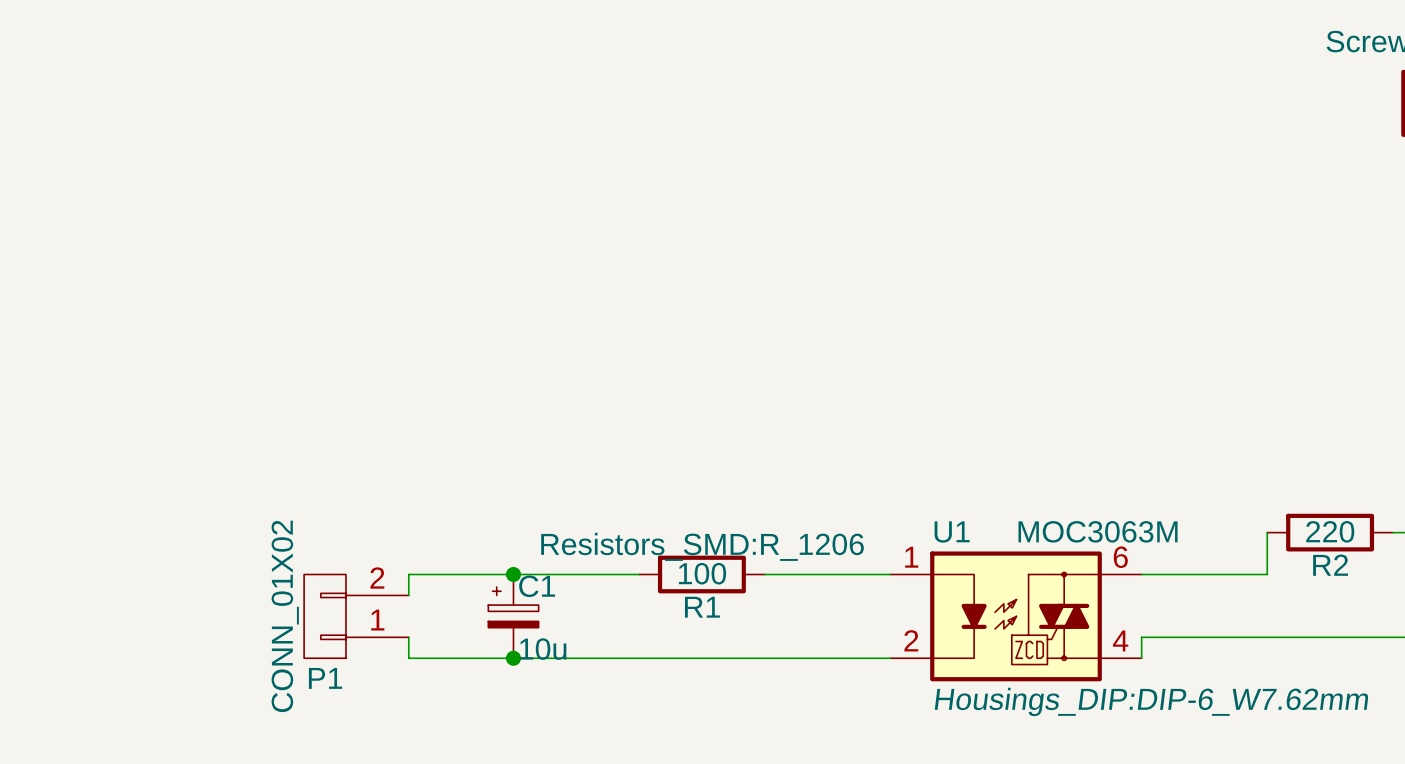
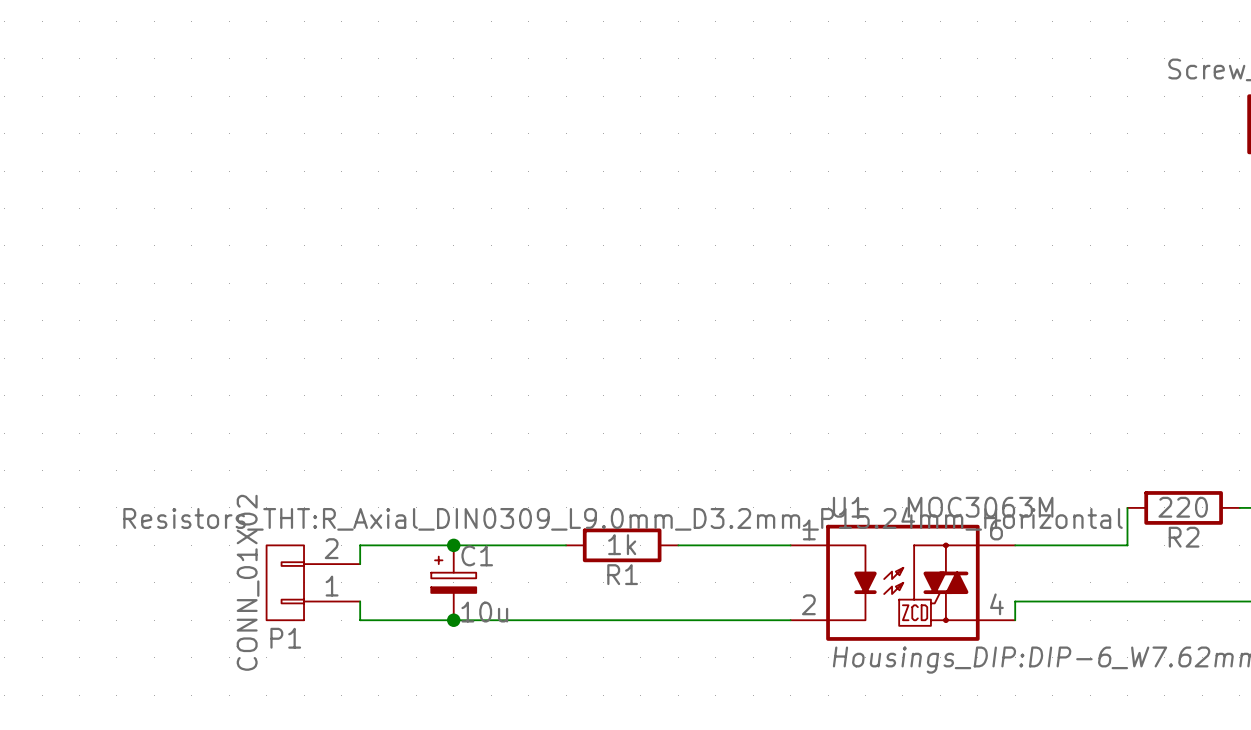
R1 text: Resistors_SMD:R_1206 (702, 546) -> Resistors_THT:R_Axial_DIN0309_L9.0mm_D3.2mm_P15.24mm_Horizontal (623, 518)
R1 value: 100 (702, 573) -> 1k (622, 544)

